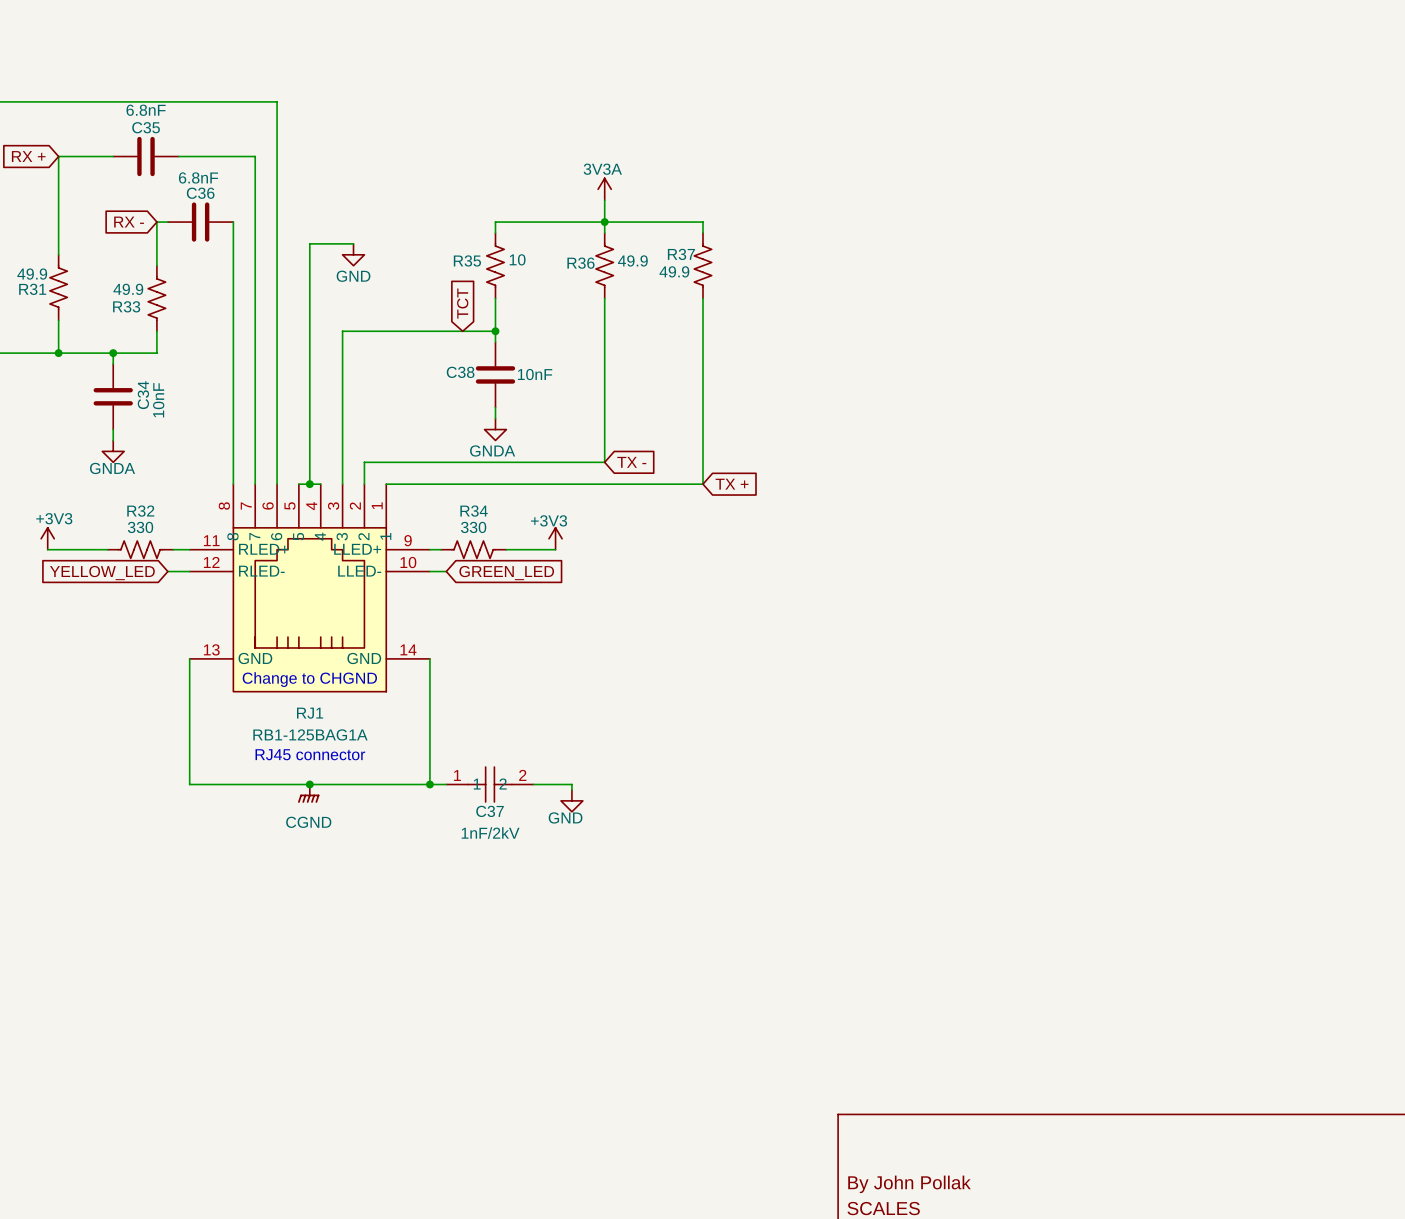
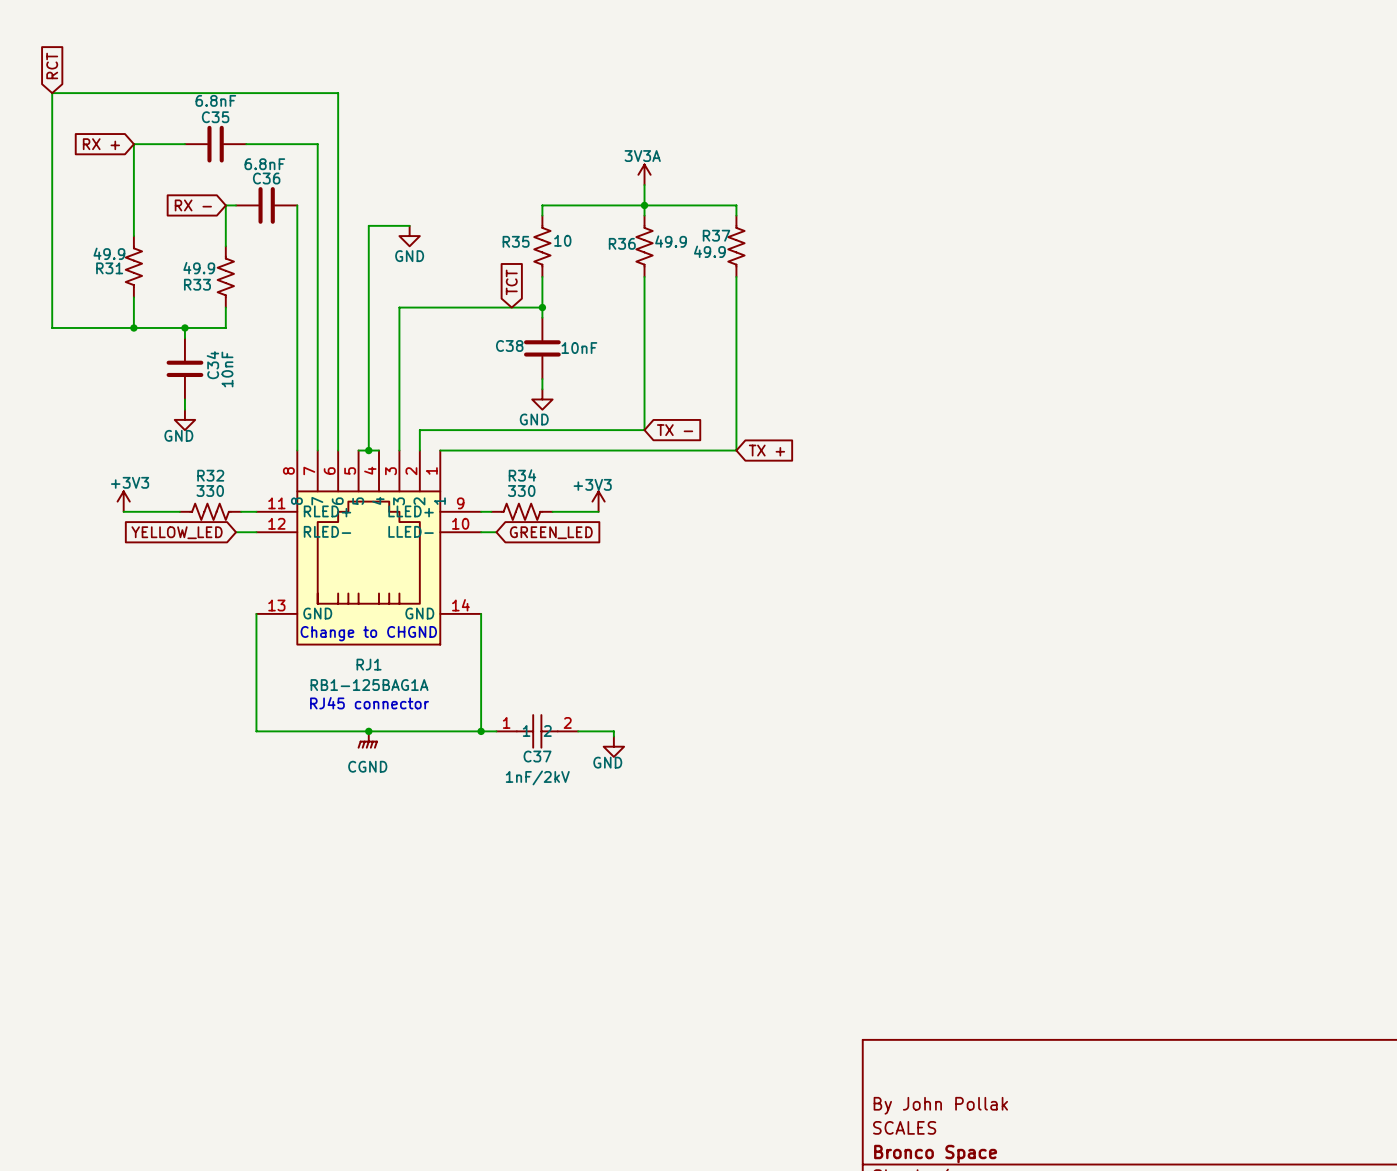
power symbol: GNDA (495, 429) -> GND (542, 399)
power symbol: GNDA (113, 451) -> GND (184, 419)

